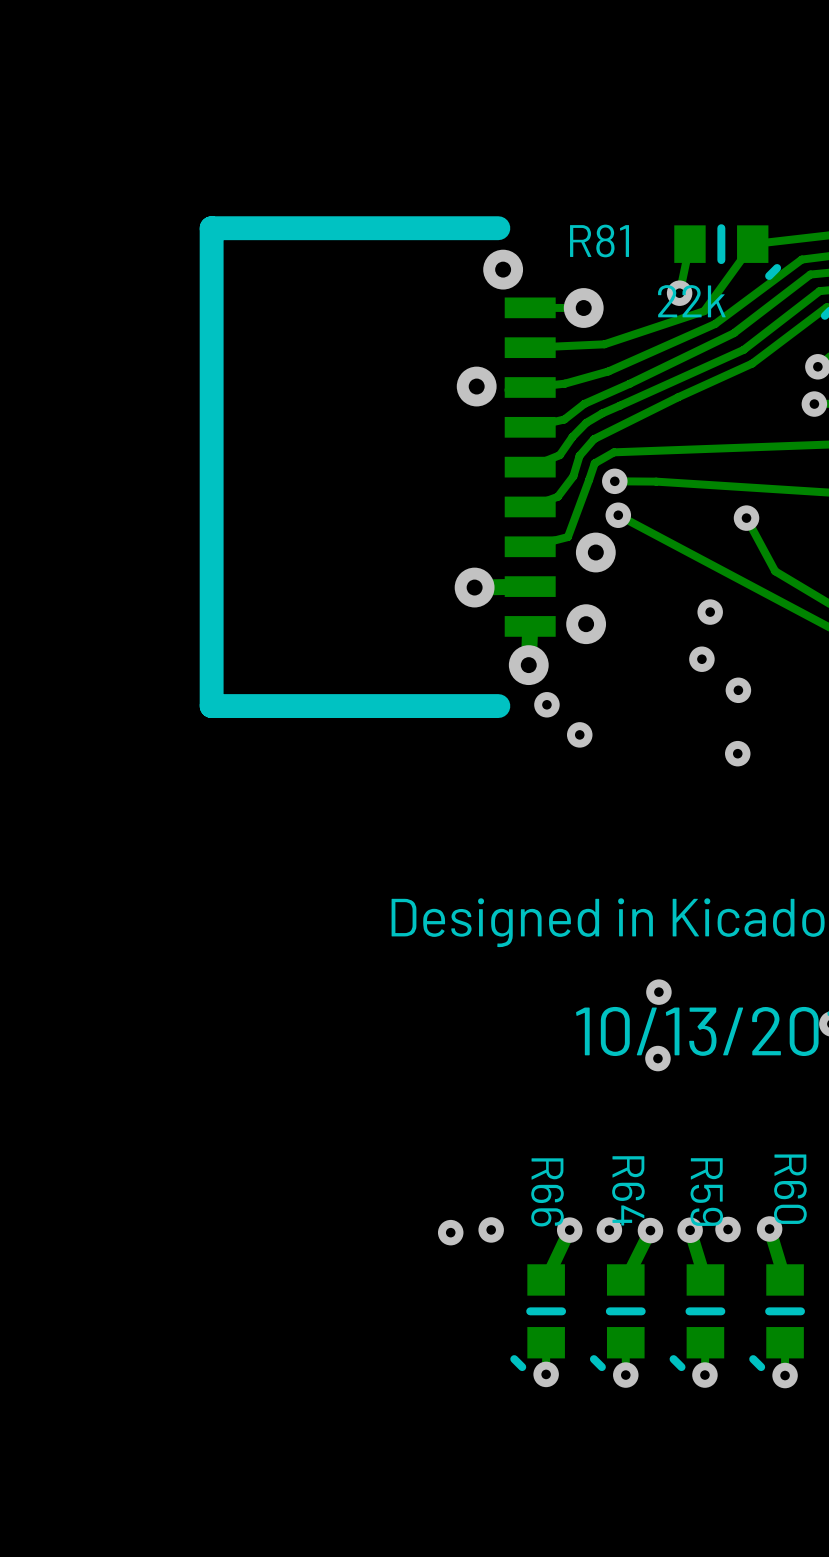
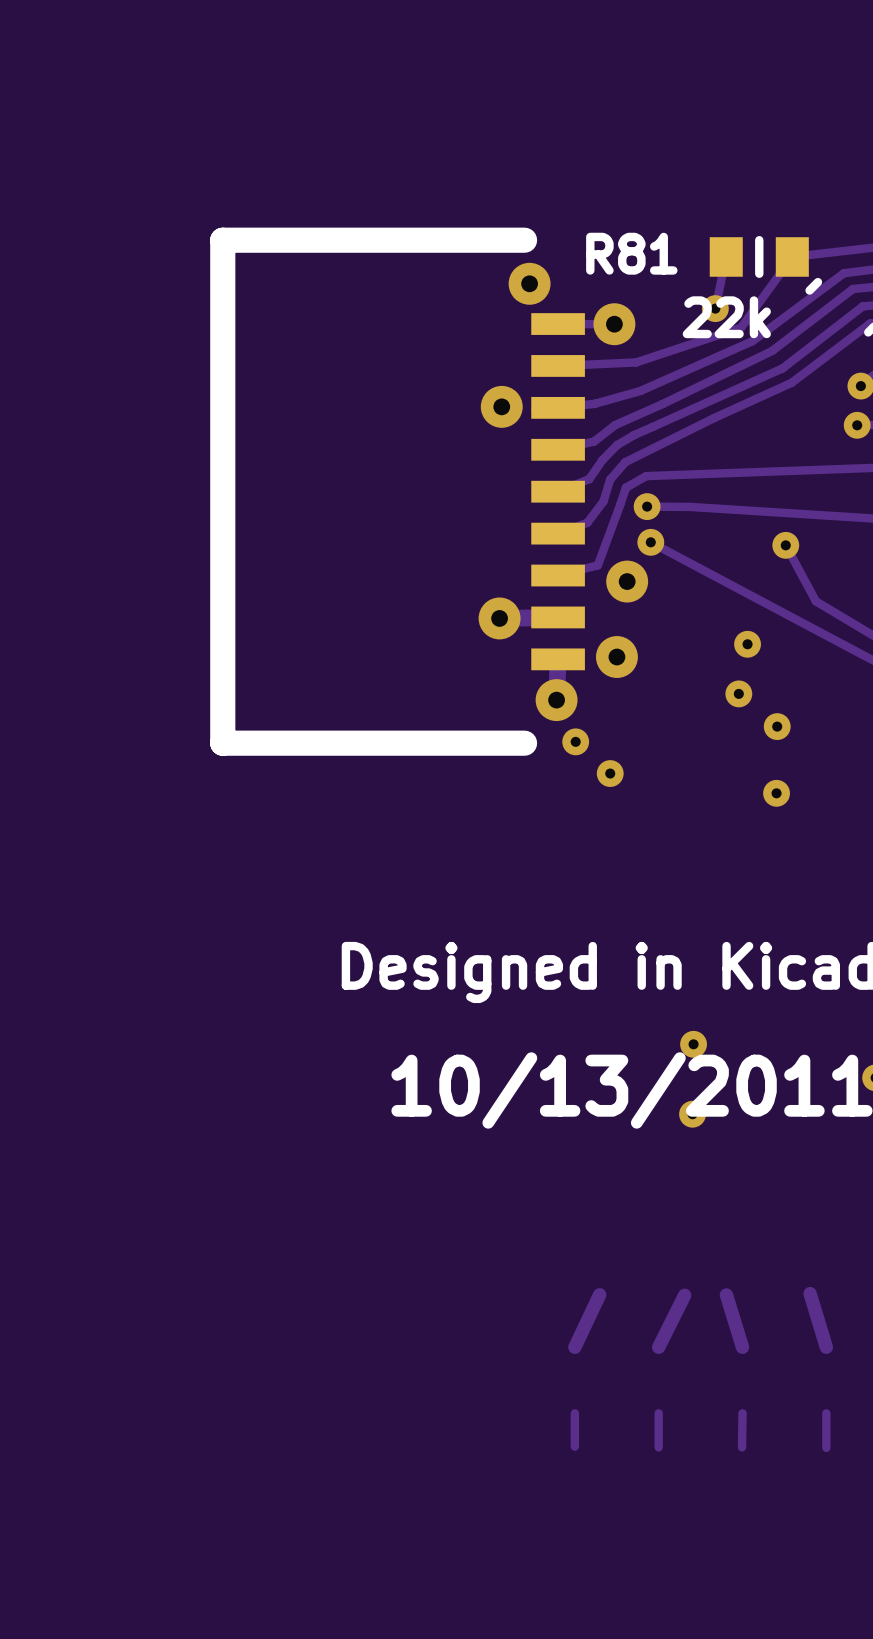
via: (769, 1228) -> none
via: (491, 1229) -> none
via: (728, 1229) -> none
via: (569, 1230) -> none
via: (609, 1230) -> none
via: (650, 1230) -> none
via: (690, 1230) -> none
via: (450, 1232) -> none
R66: (538, 1317) -> none
R64: (617, 1317) -> none
R59: (697, 1317) -> none
R60: (777, 1317) -> none
via: (546, 1374) -> none
via: (625, 1375) -> none
via: (704, 1375) -> none
via: (785, 1375) -> none

